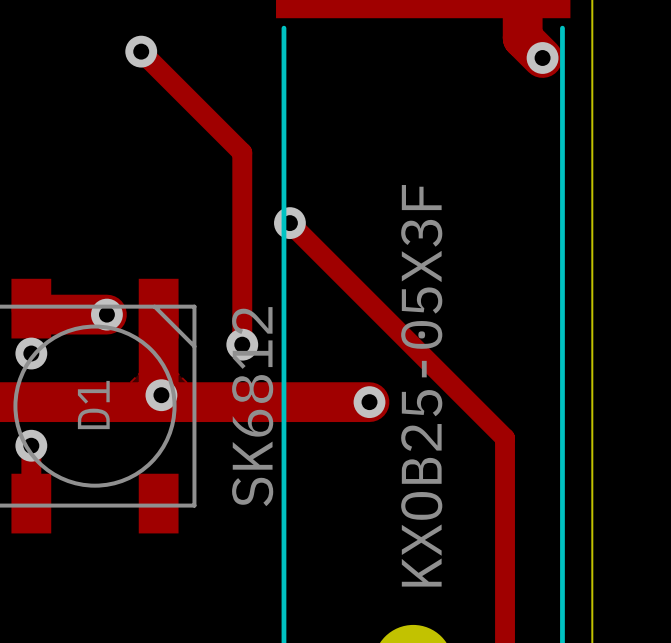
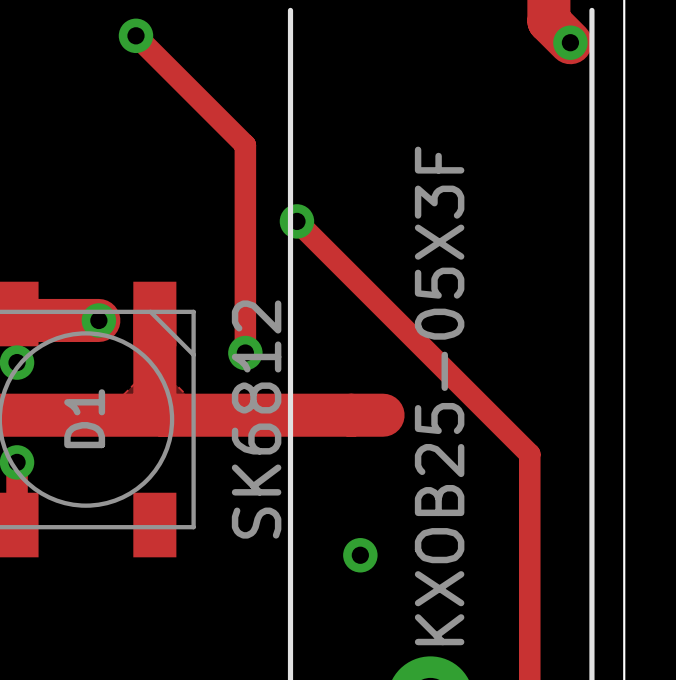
via: (161, 395) -> none
via: (369, 402) -> none
via: none -> (360, 555)

